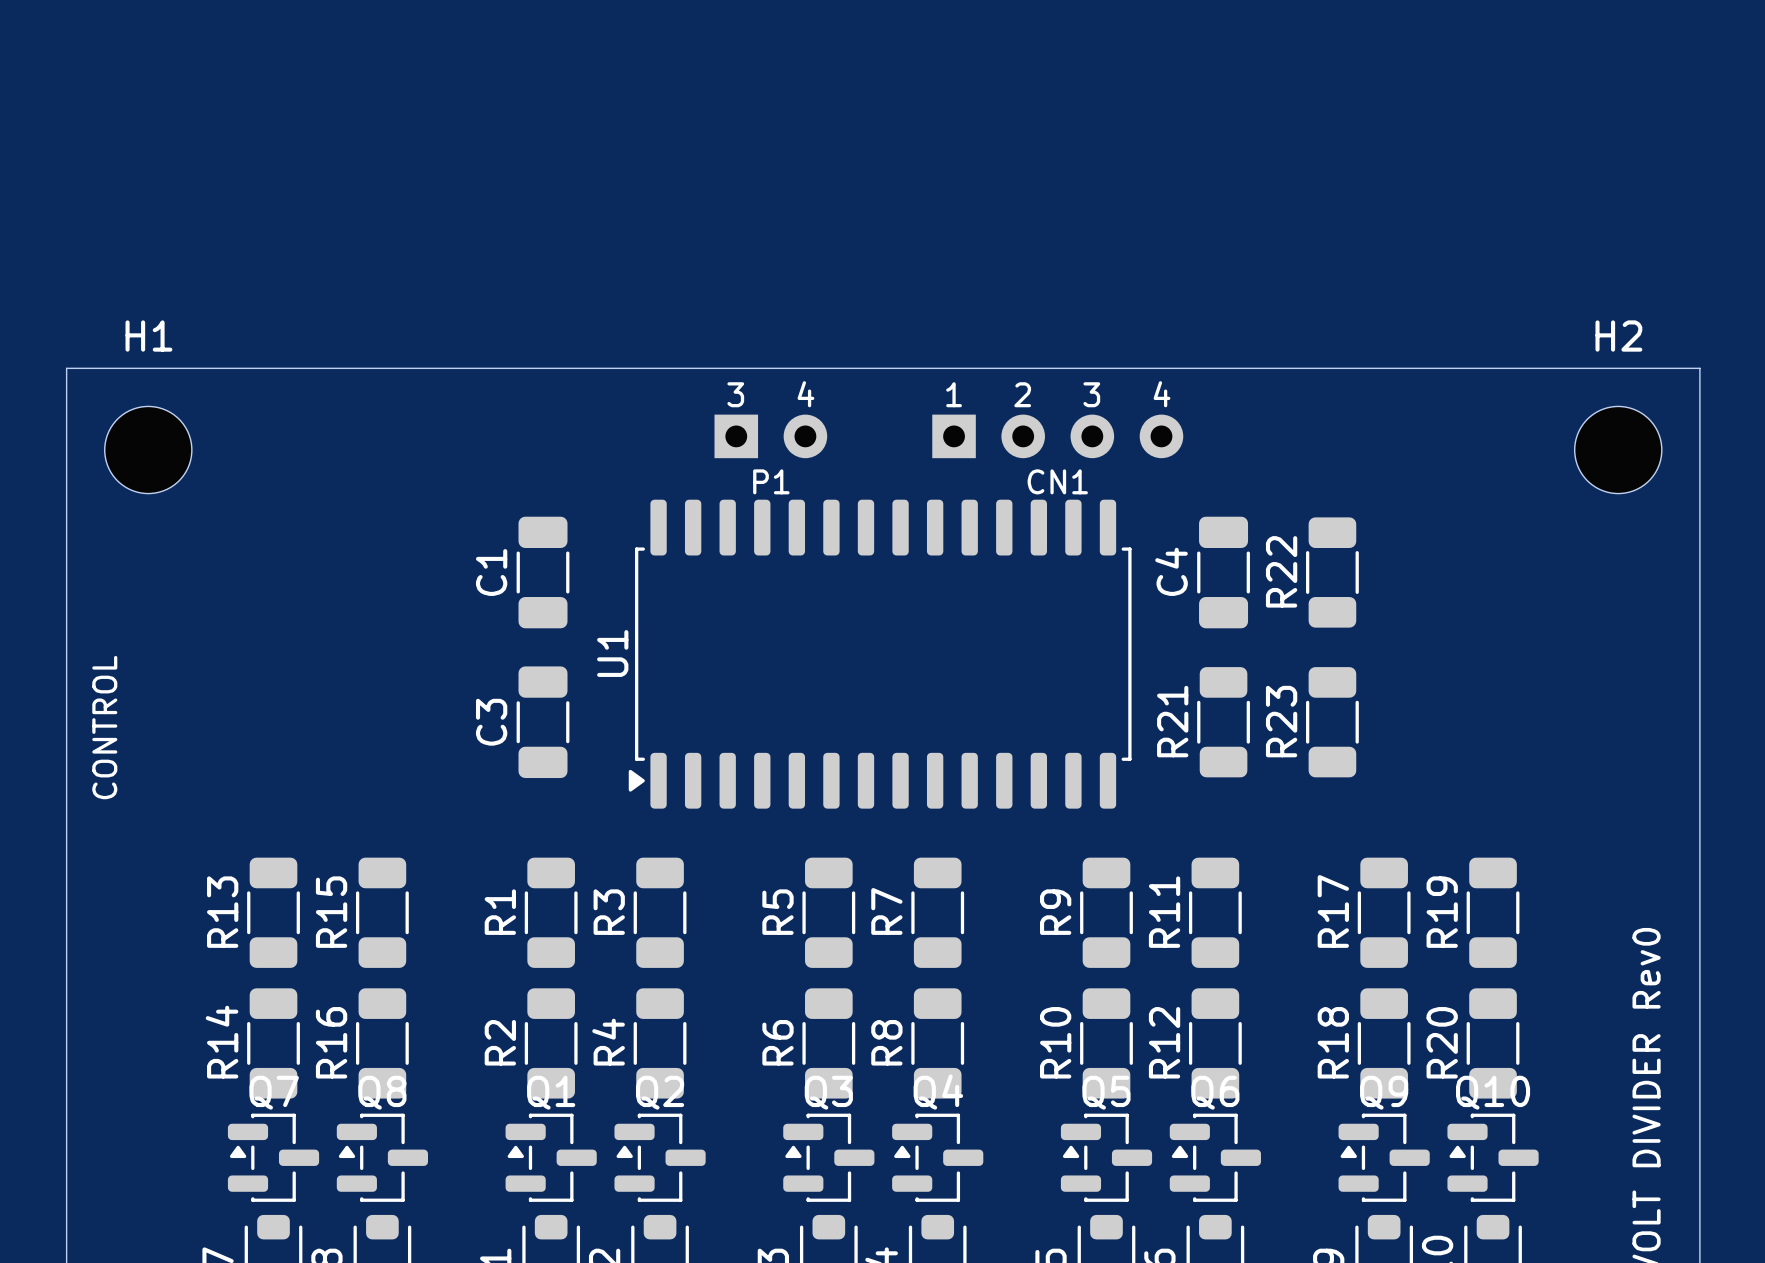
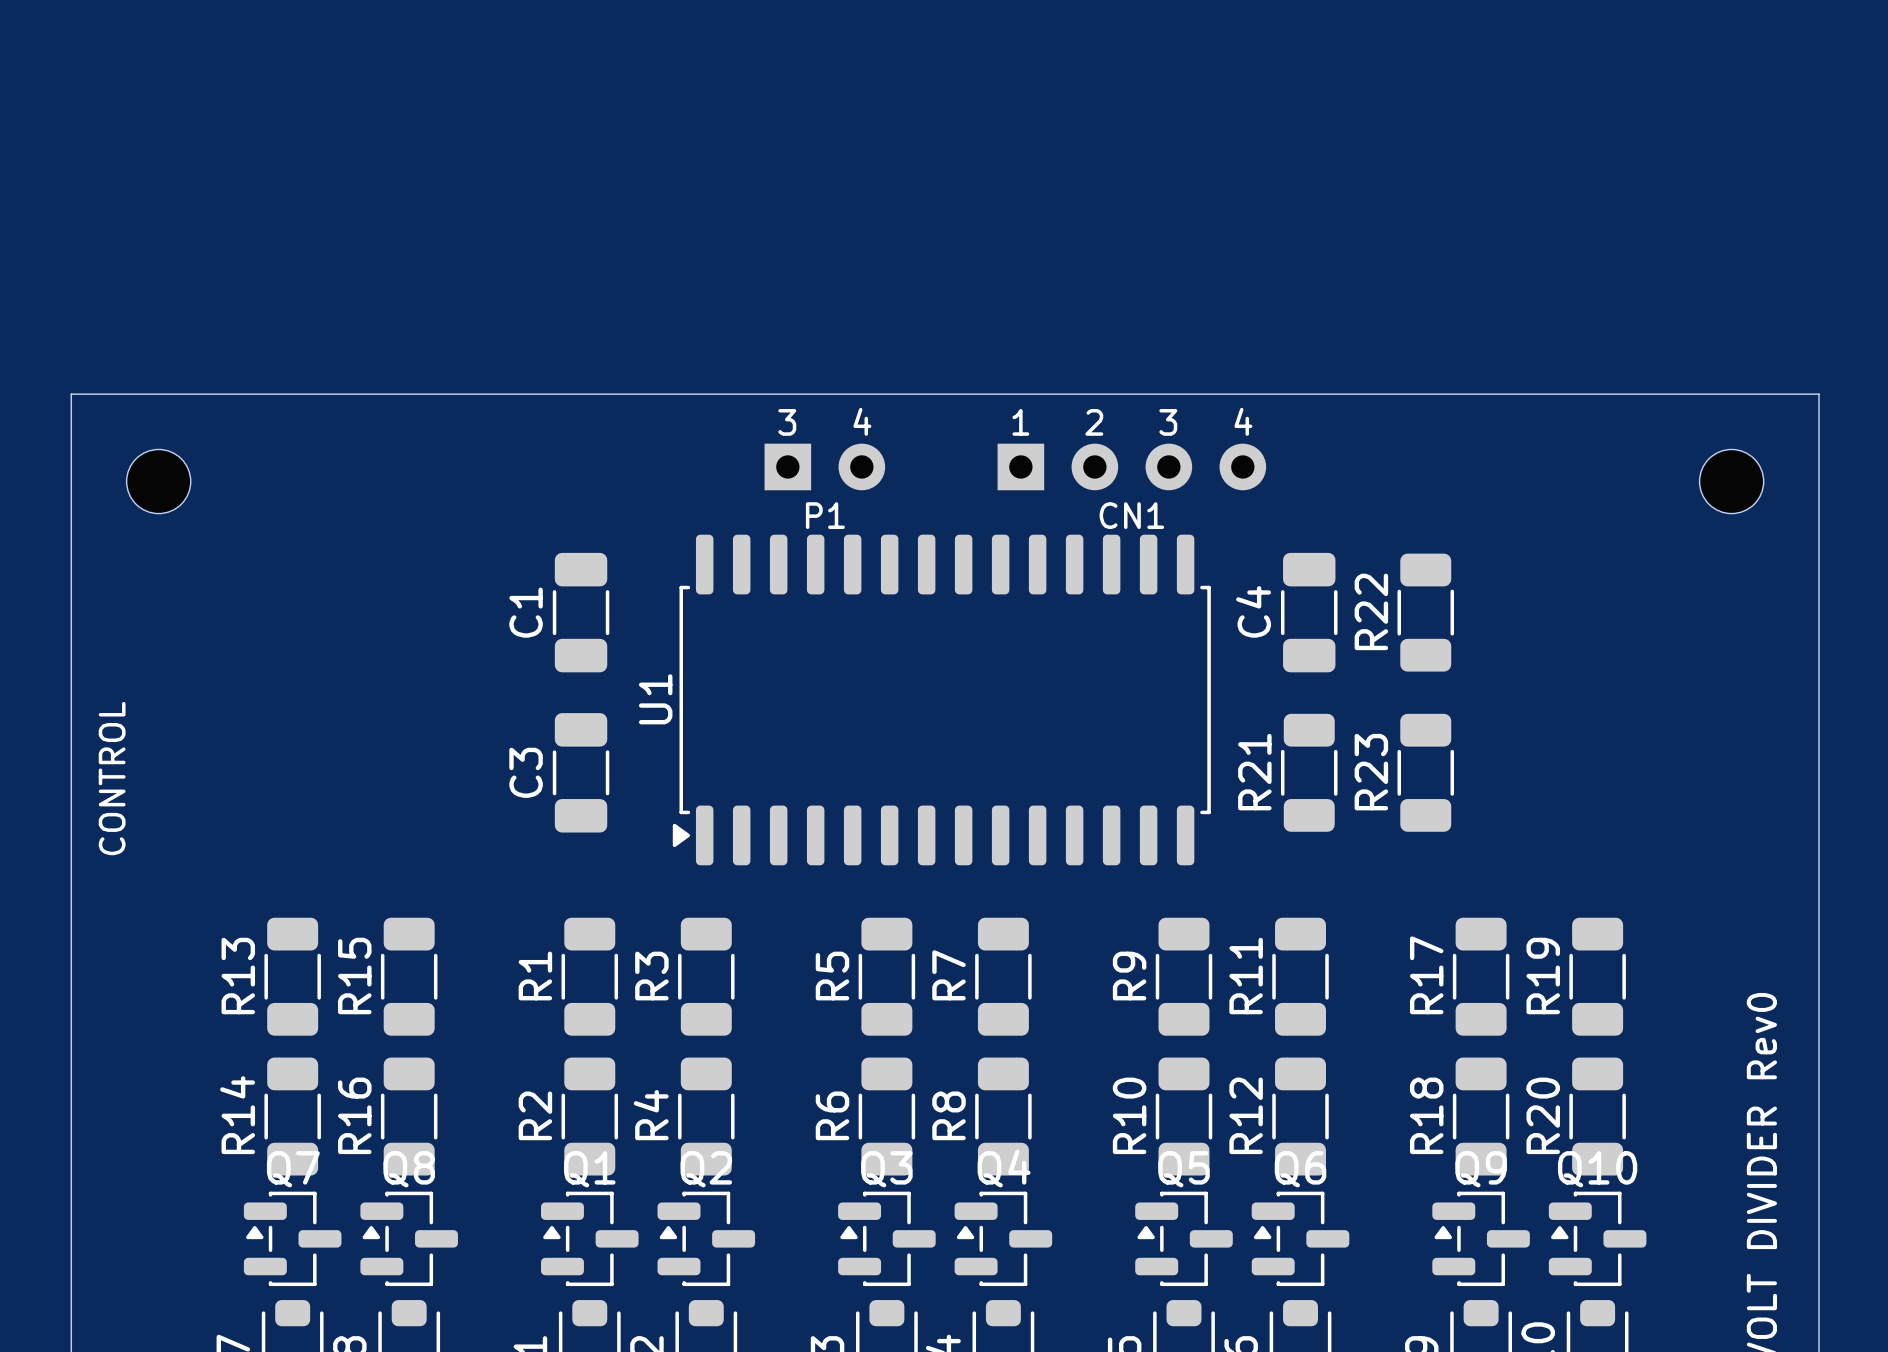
H1: (148, 450) -> none
part: none -> (158, 481)
H2: (1618, 450) -> none
part: none -> (1731, 481)

